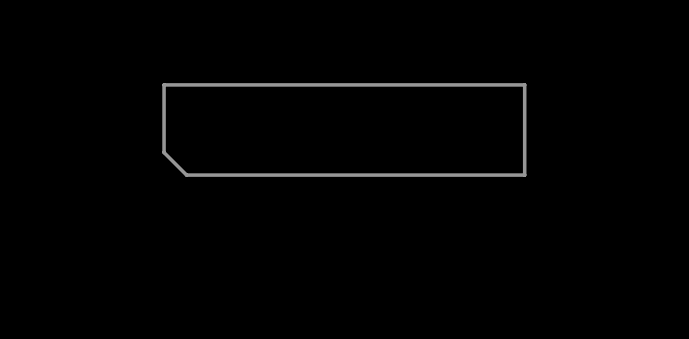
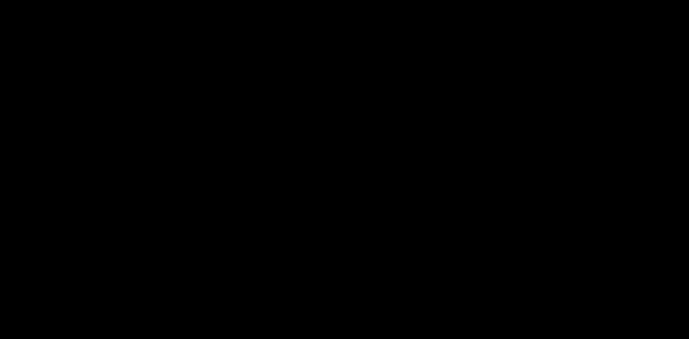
drawing: [162, 83, 527, 177] -> none

